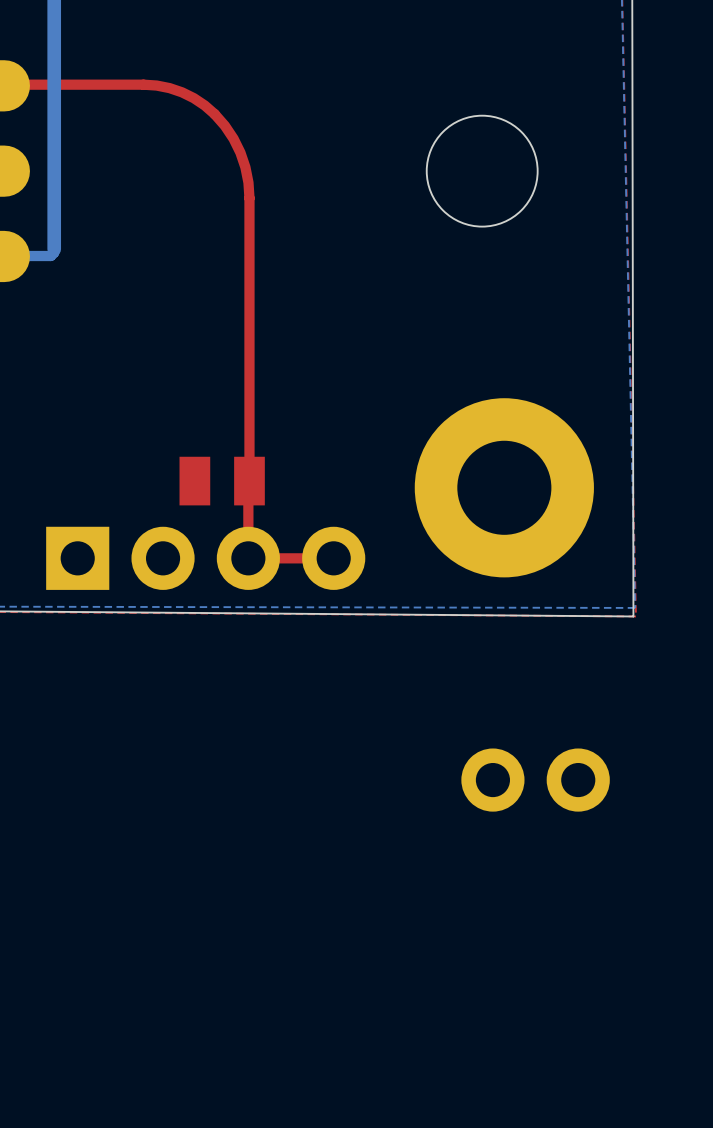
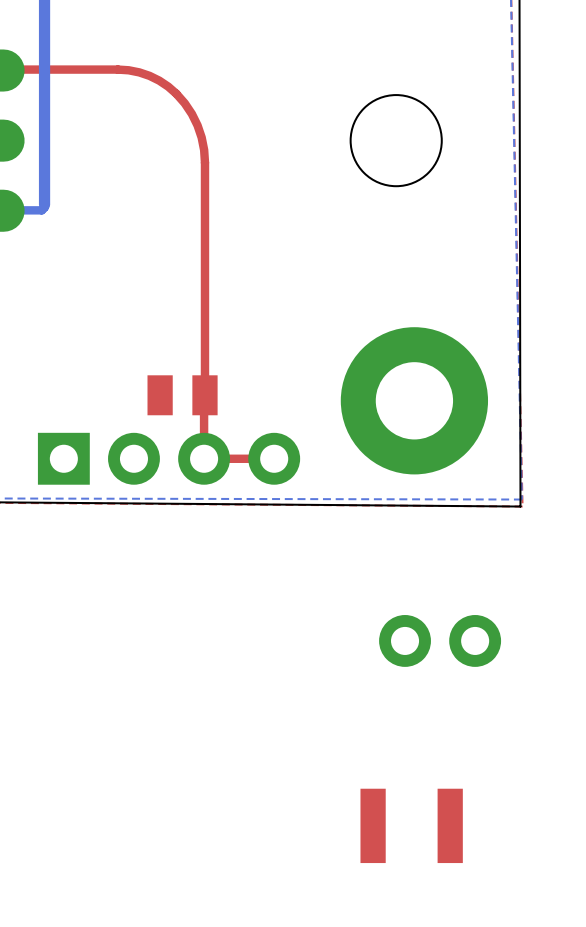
part: none -> (411, 825)

